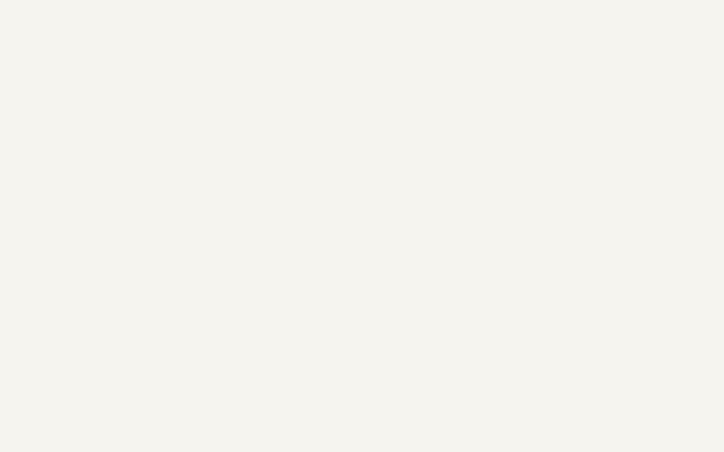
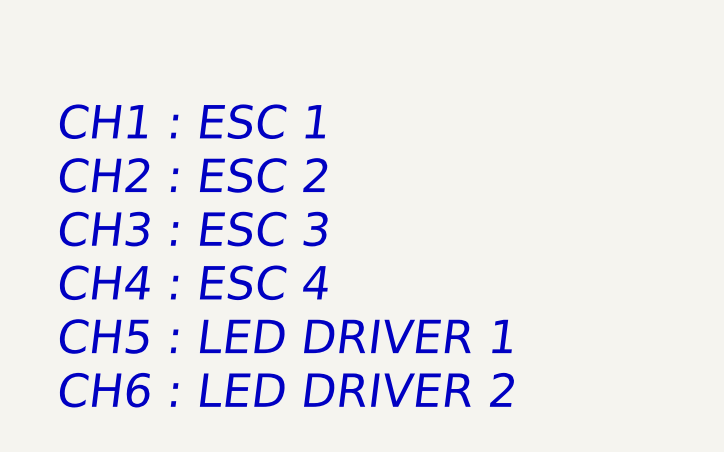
text: none -> CH1 : ESC 1 (192, 121)
text: none -> CH2 : ESC 2 (193, 175)
text: none -> CH3 : ESC 3 (193, 229)
text: none -> CH4 : ESC 4 (193, 282)
text: none -> CH5 : LED DRIVER 1 (285, 336)
text: none -> CH6 : LED DRIVER 2 (286, 390)

